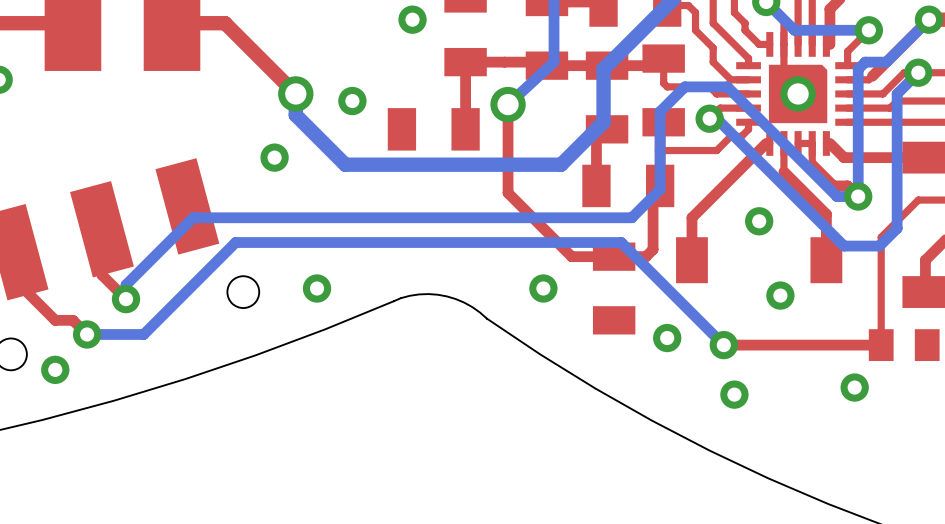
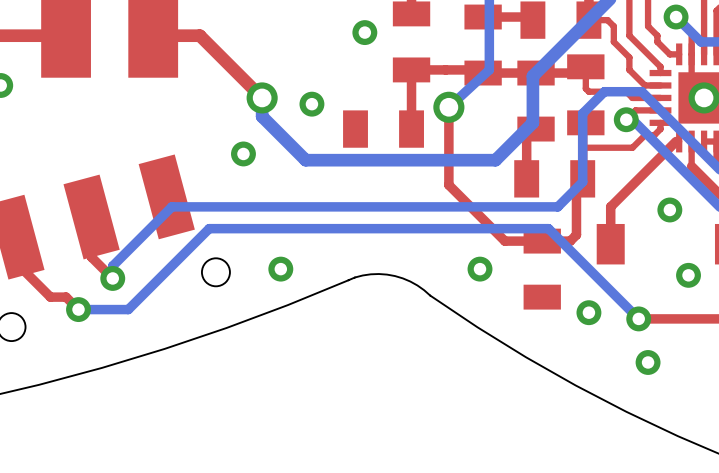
via: (55, 369) -> none

